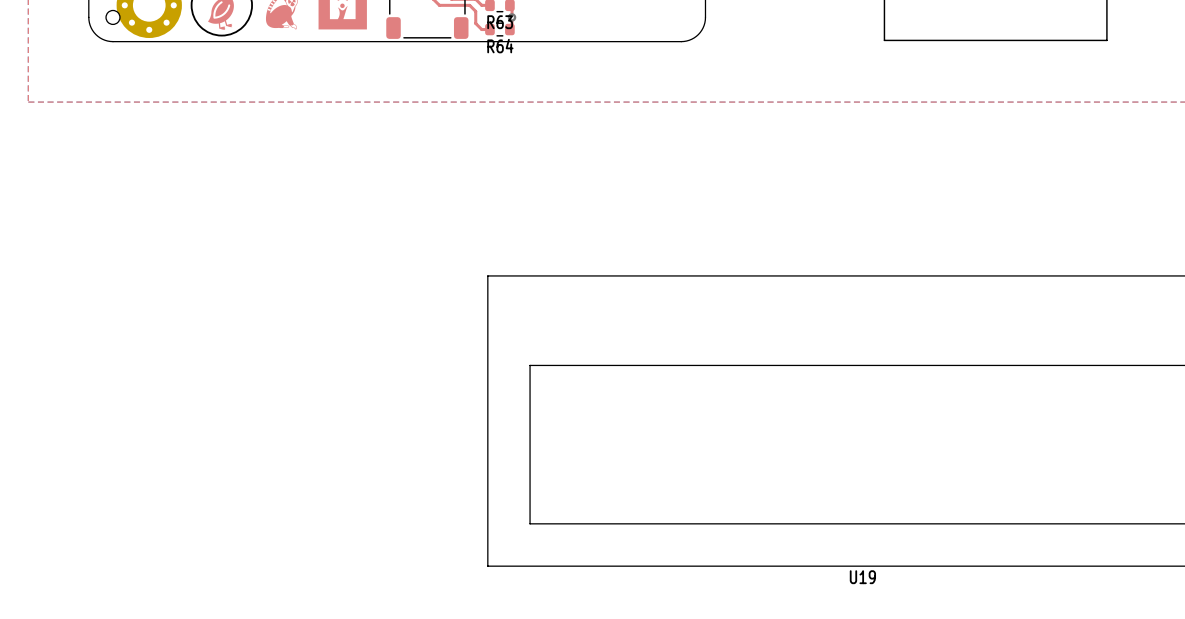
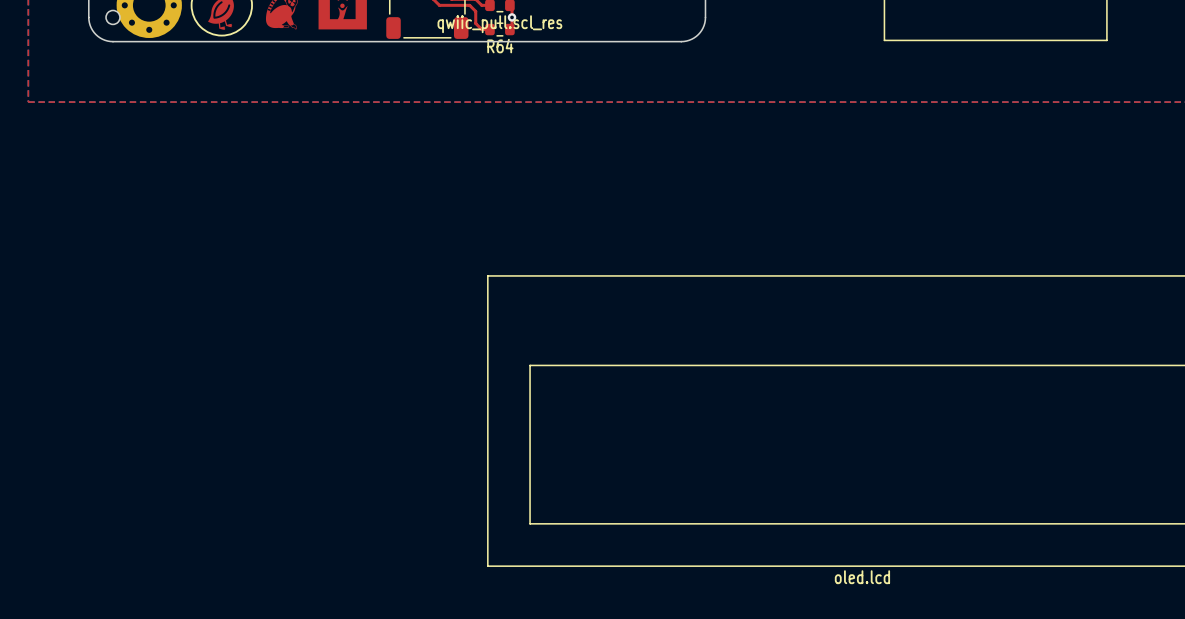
R63 name: R63 (500, 22) -> qwiic_pull.scl_res (499, 24)
U19 name: U19 (862, 577) -> oled.lcd (862, 577)

